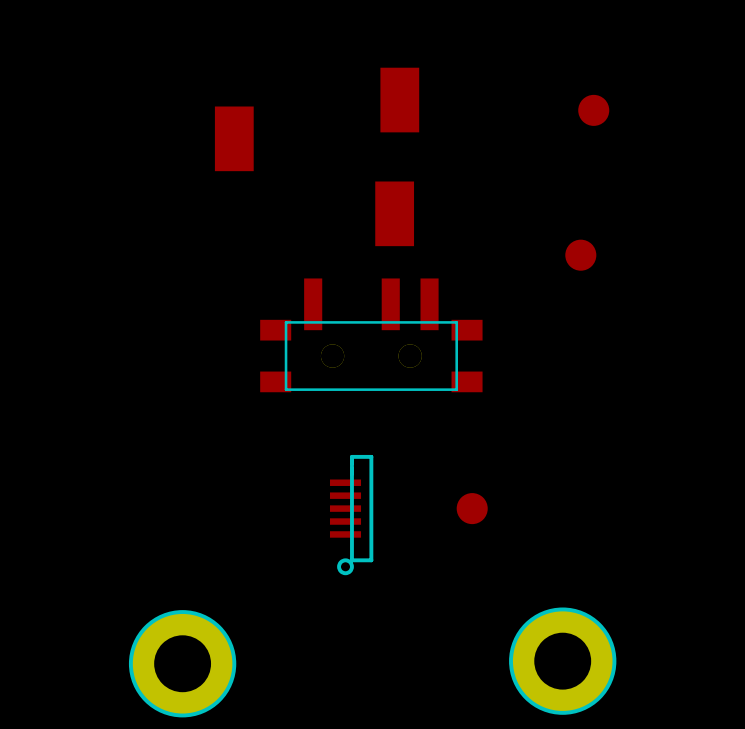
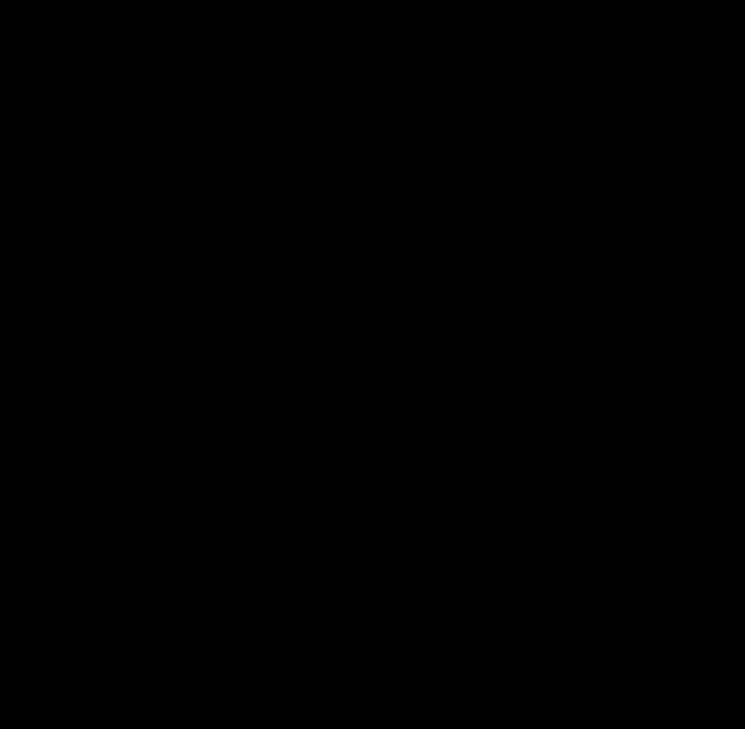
part: (399, 100) -> none
part: (593, 110) -> none
part: (234, 138) -> none
part: (394, 213) -> none
part: (580, 255) -> none
part: (371, 335) -> none
part: (472, 508) -> none
part: (351, 515) -> none
part: (562, 661) -> none
part: (182, 663) -> none

